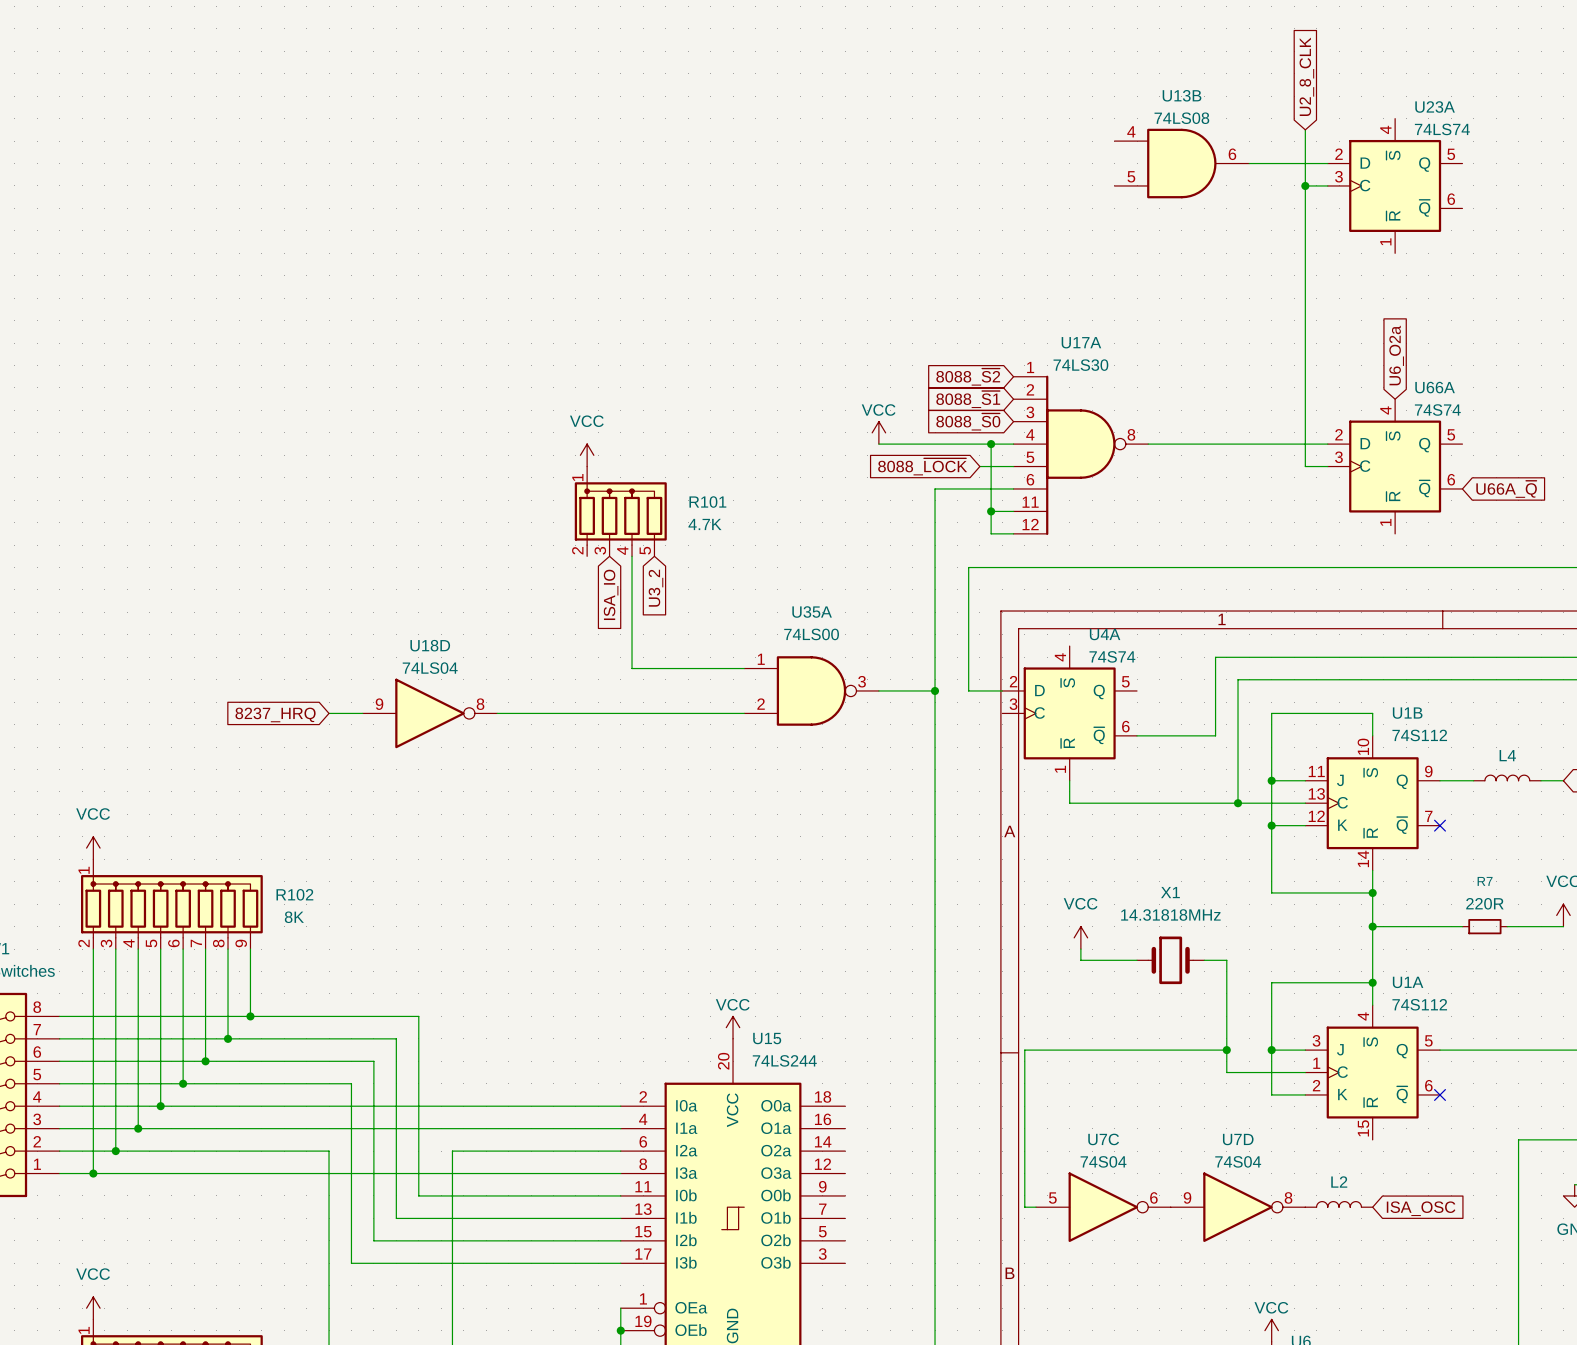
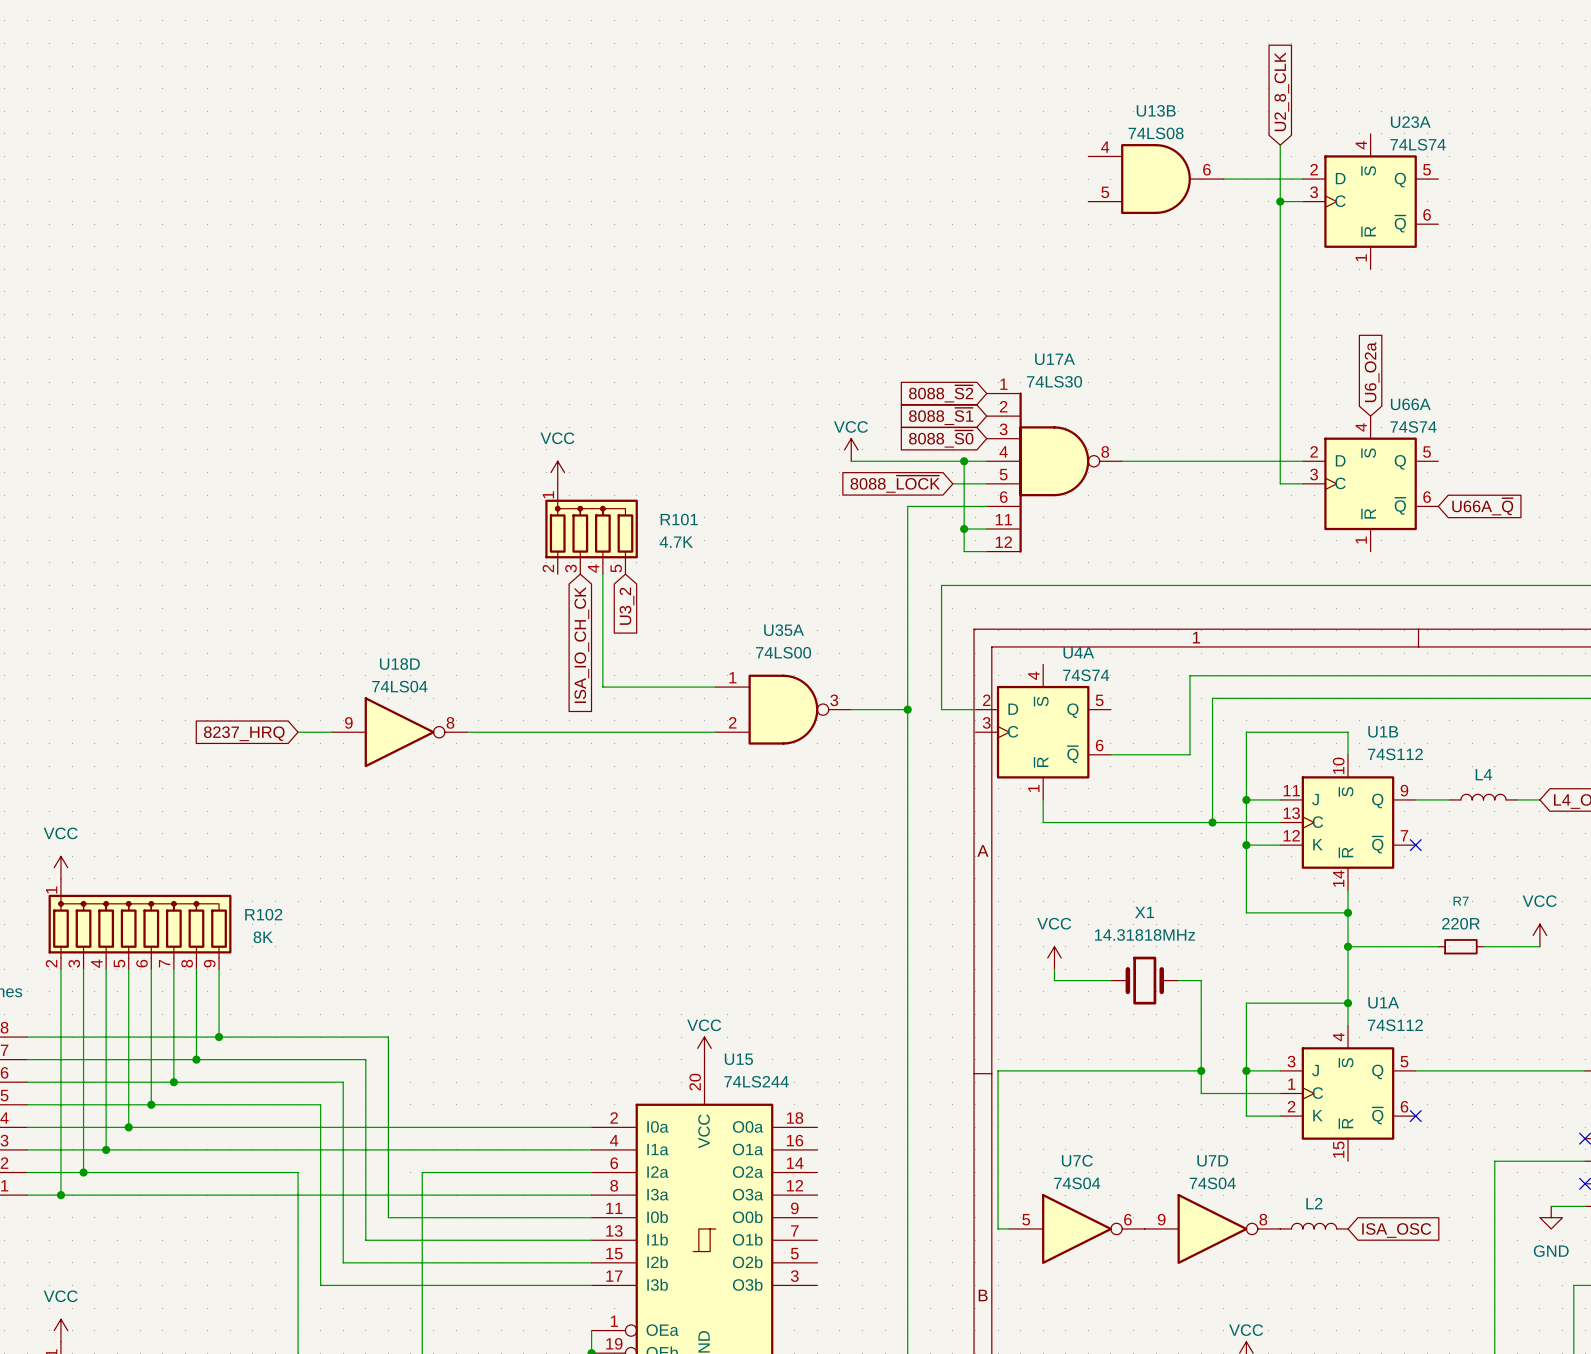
global label: ISA_IO (611, 594) -> ISA_IO_CH_CK (581, 645)

